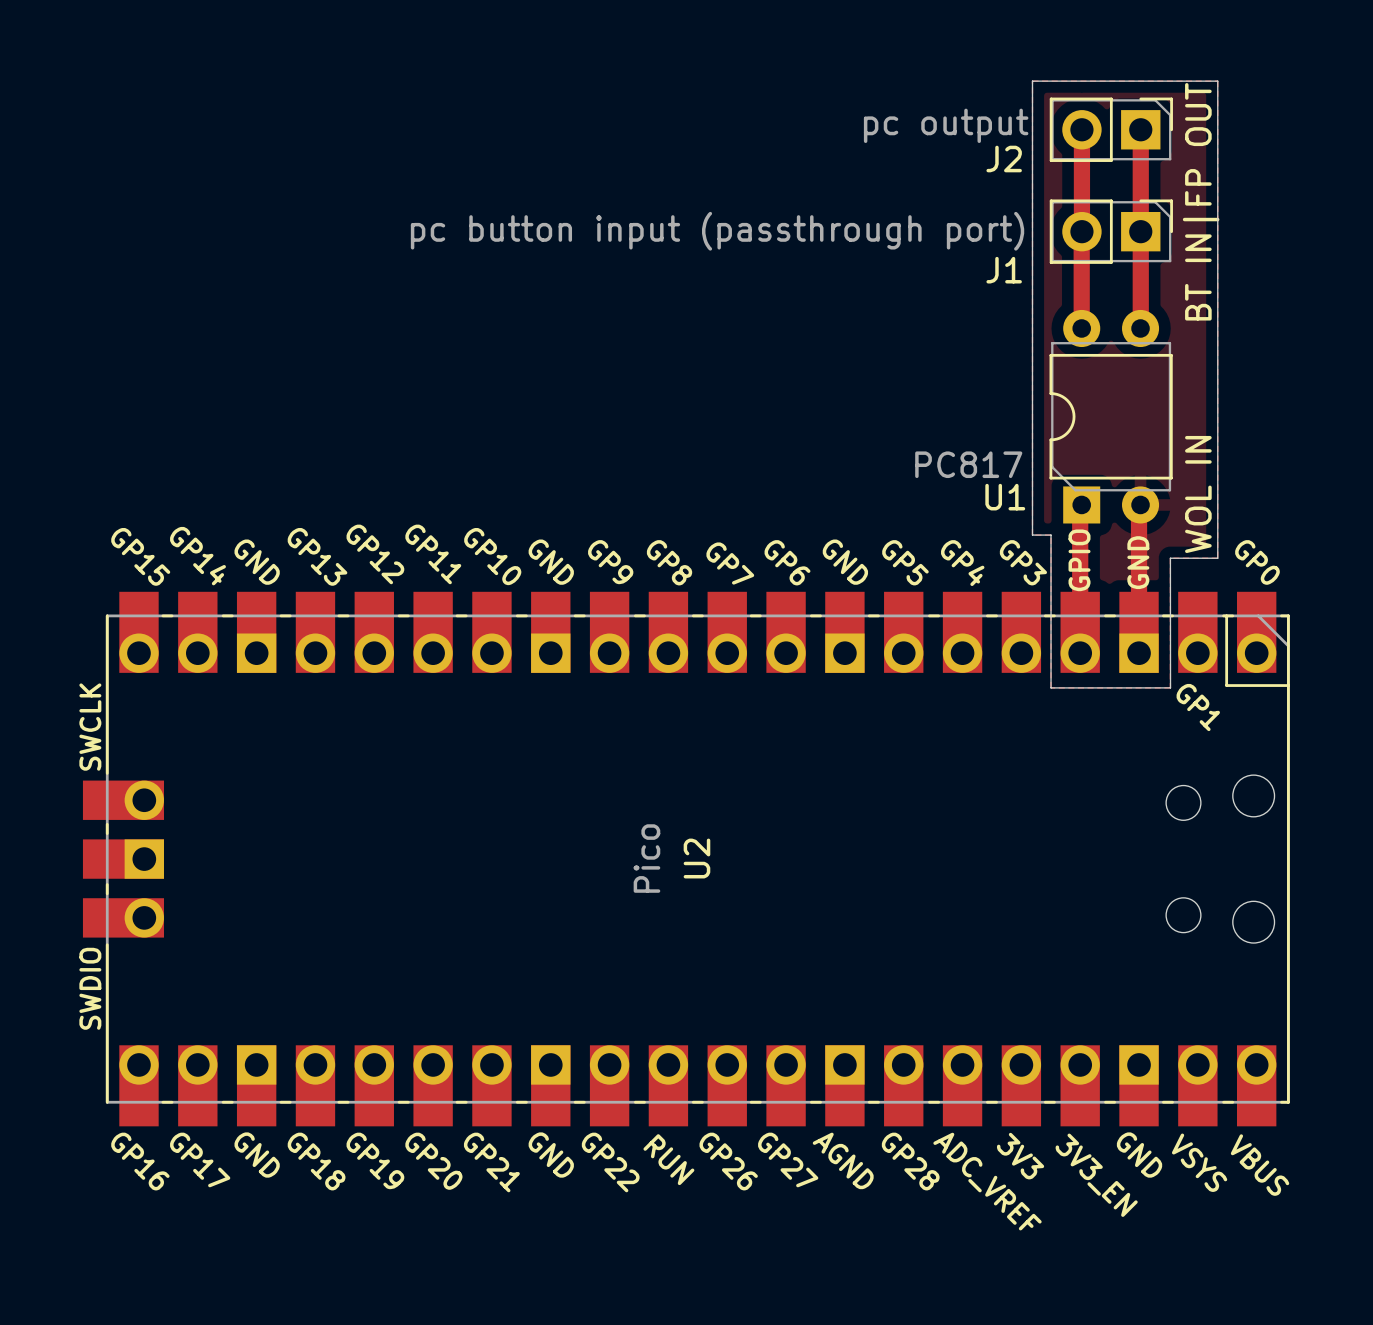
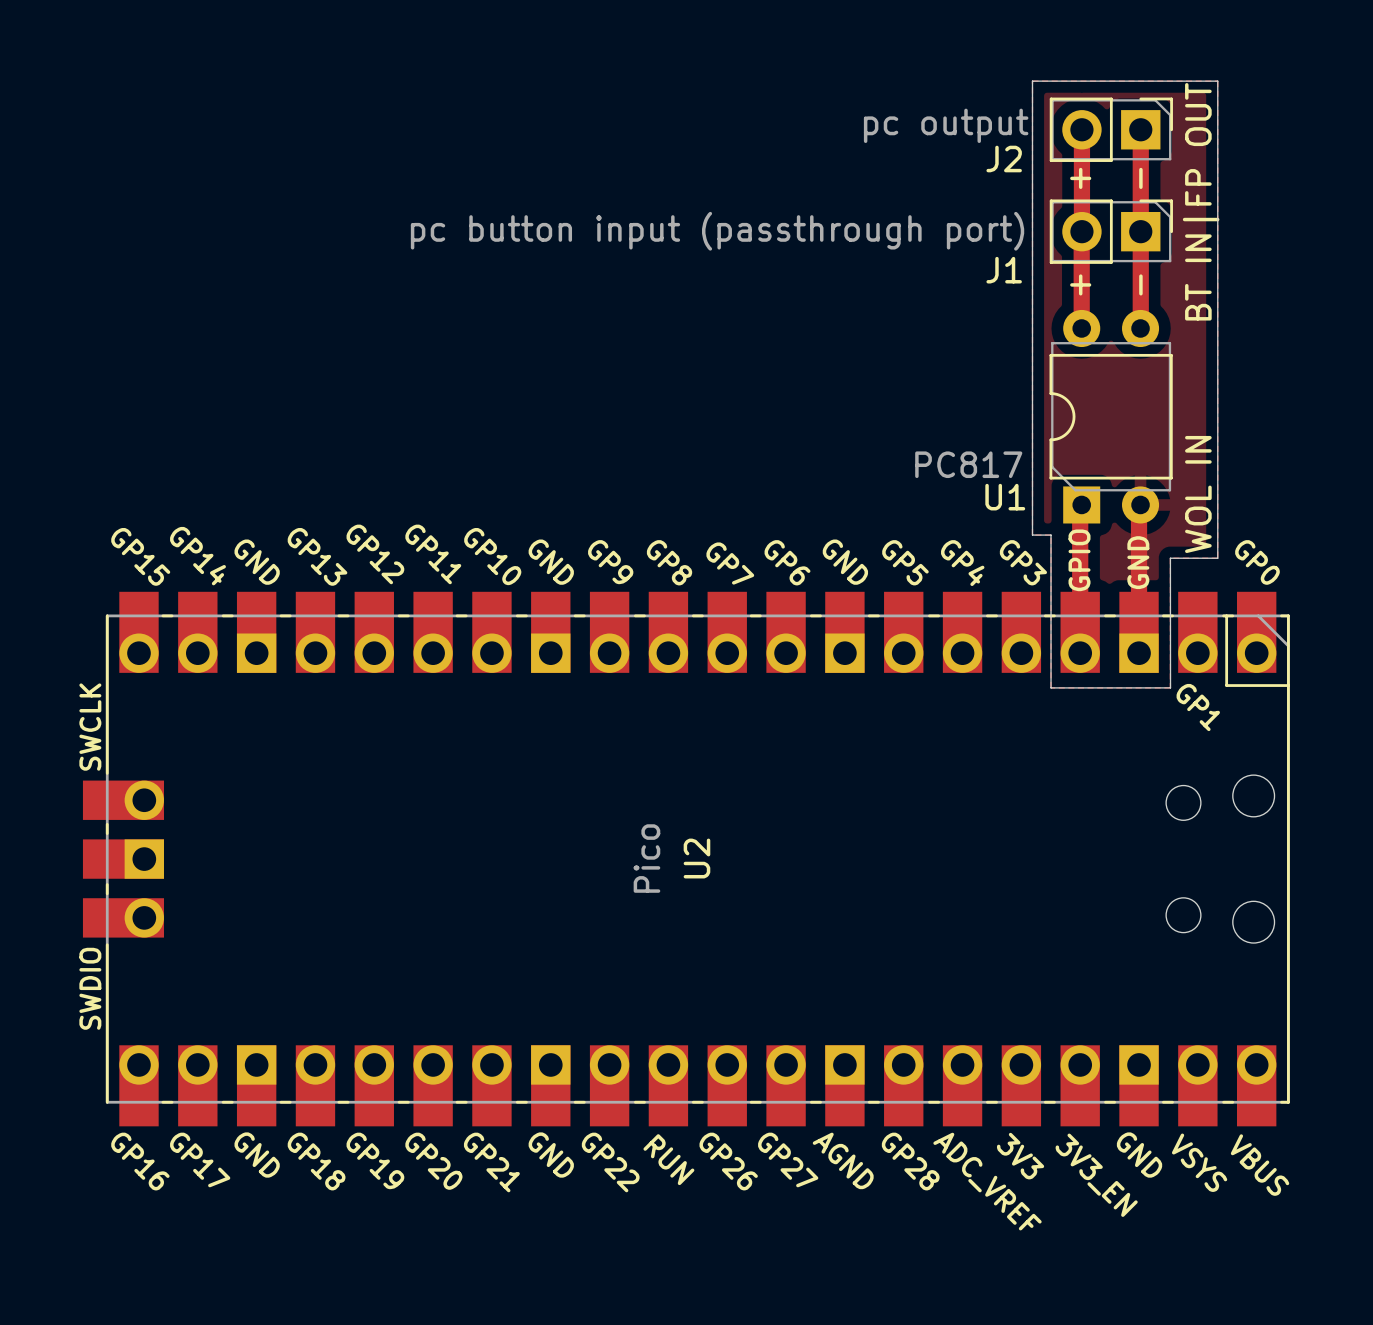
text: none -> + (1080, 178)
text: none -> - (1140, 178)
text: none -> + (1080, 284)
text: none -> - (1140, 284)

